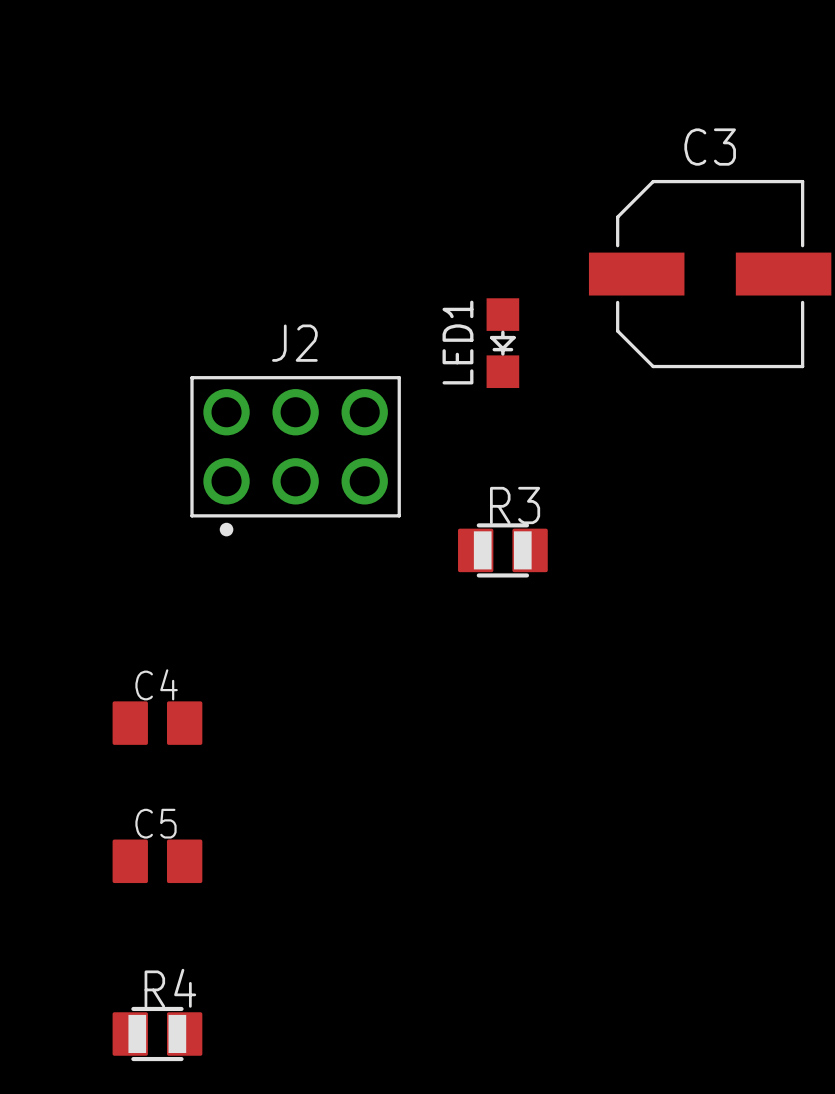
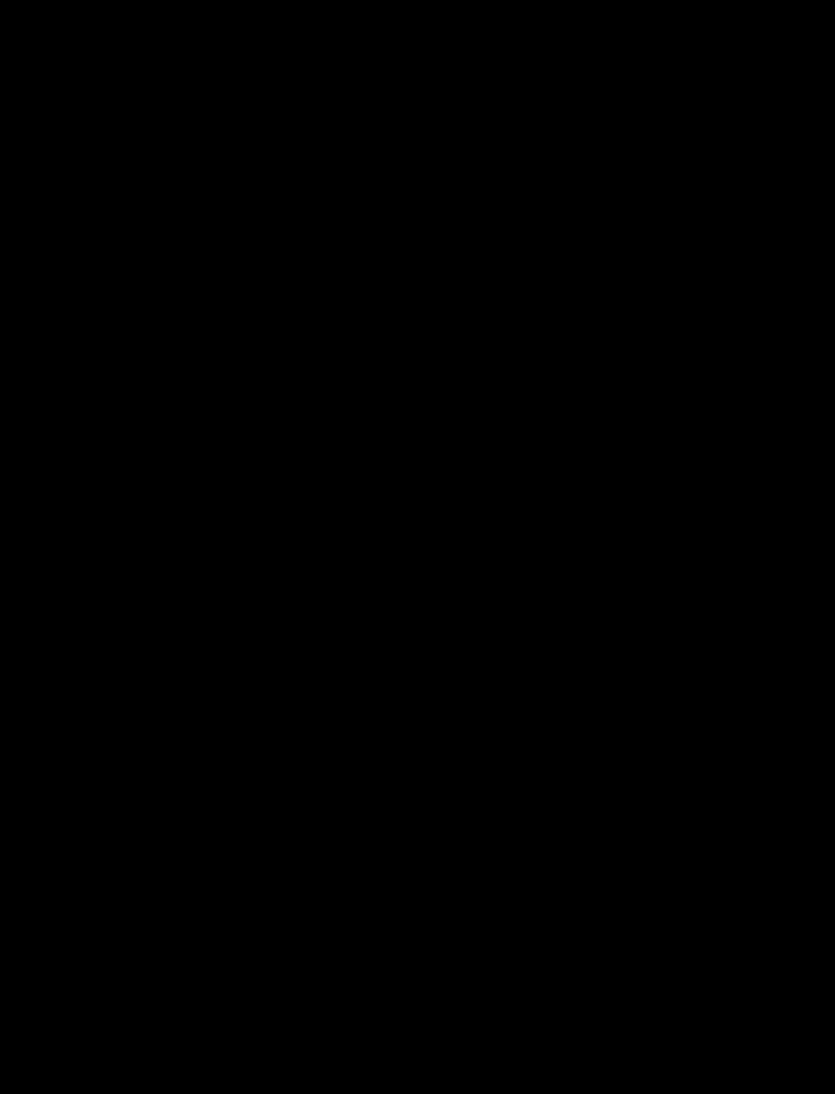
C3: (710, 274) -> none
LED1: (502, 343) -> none
J2: (295, 456) -> none
R3: (502, 550) -> none
C4: (157, 723) -> none
C5: (157, 861) -> none
R4: (157, 1034) -> none

